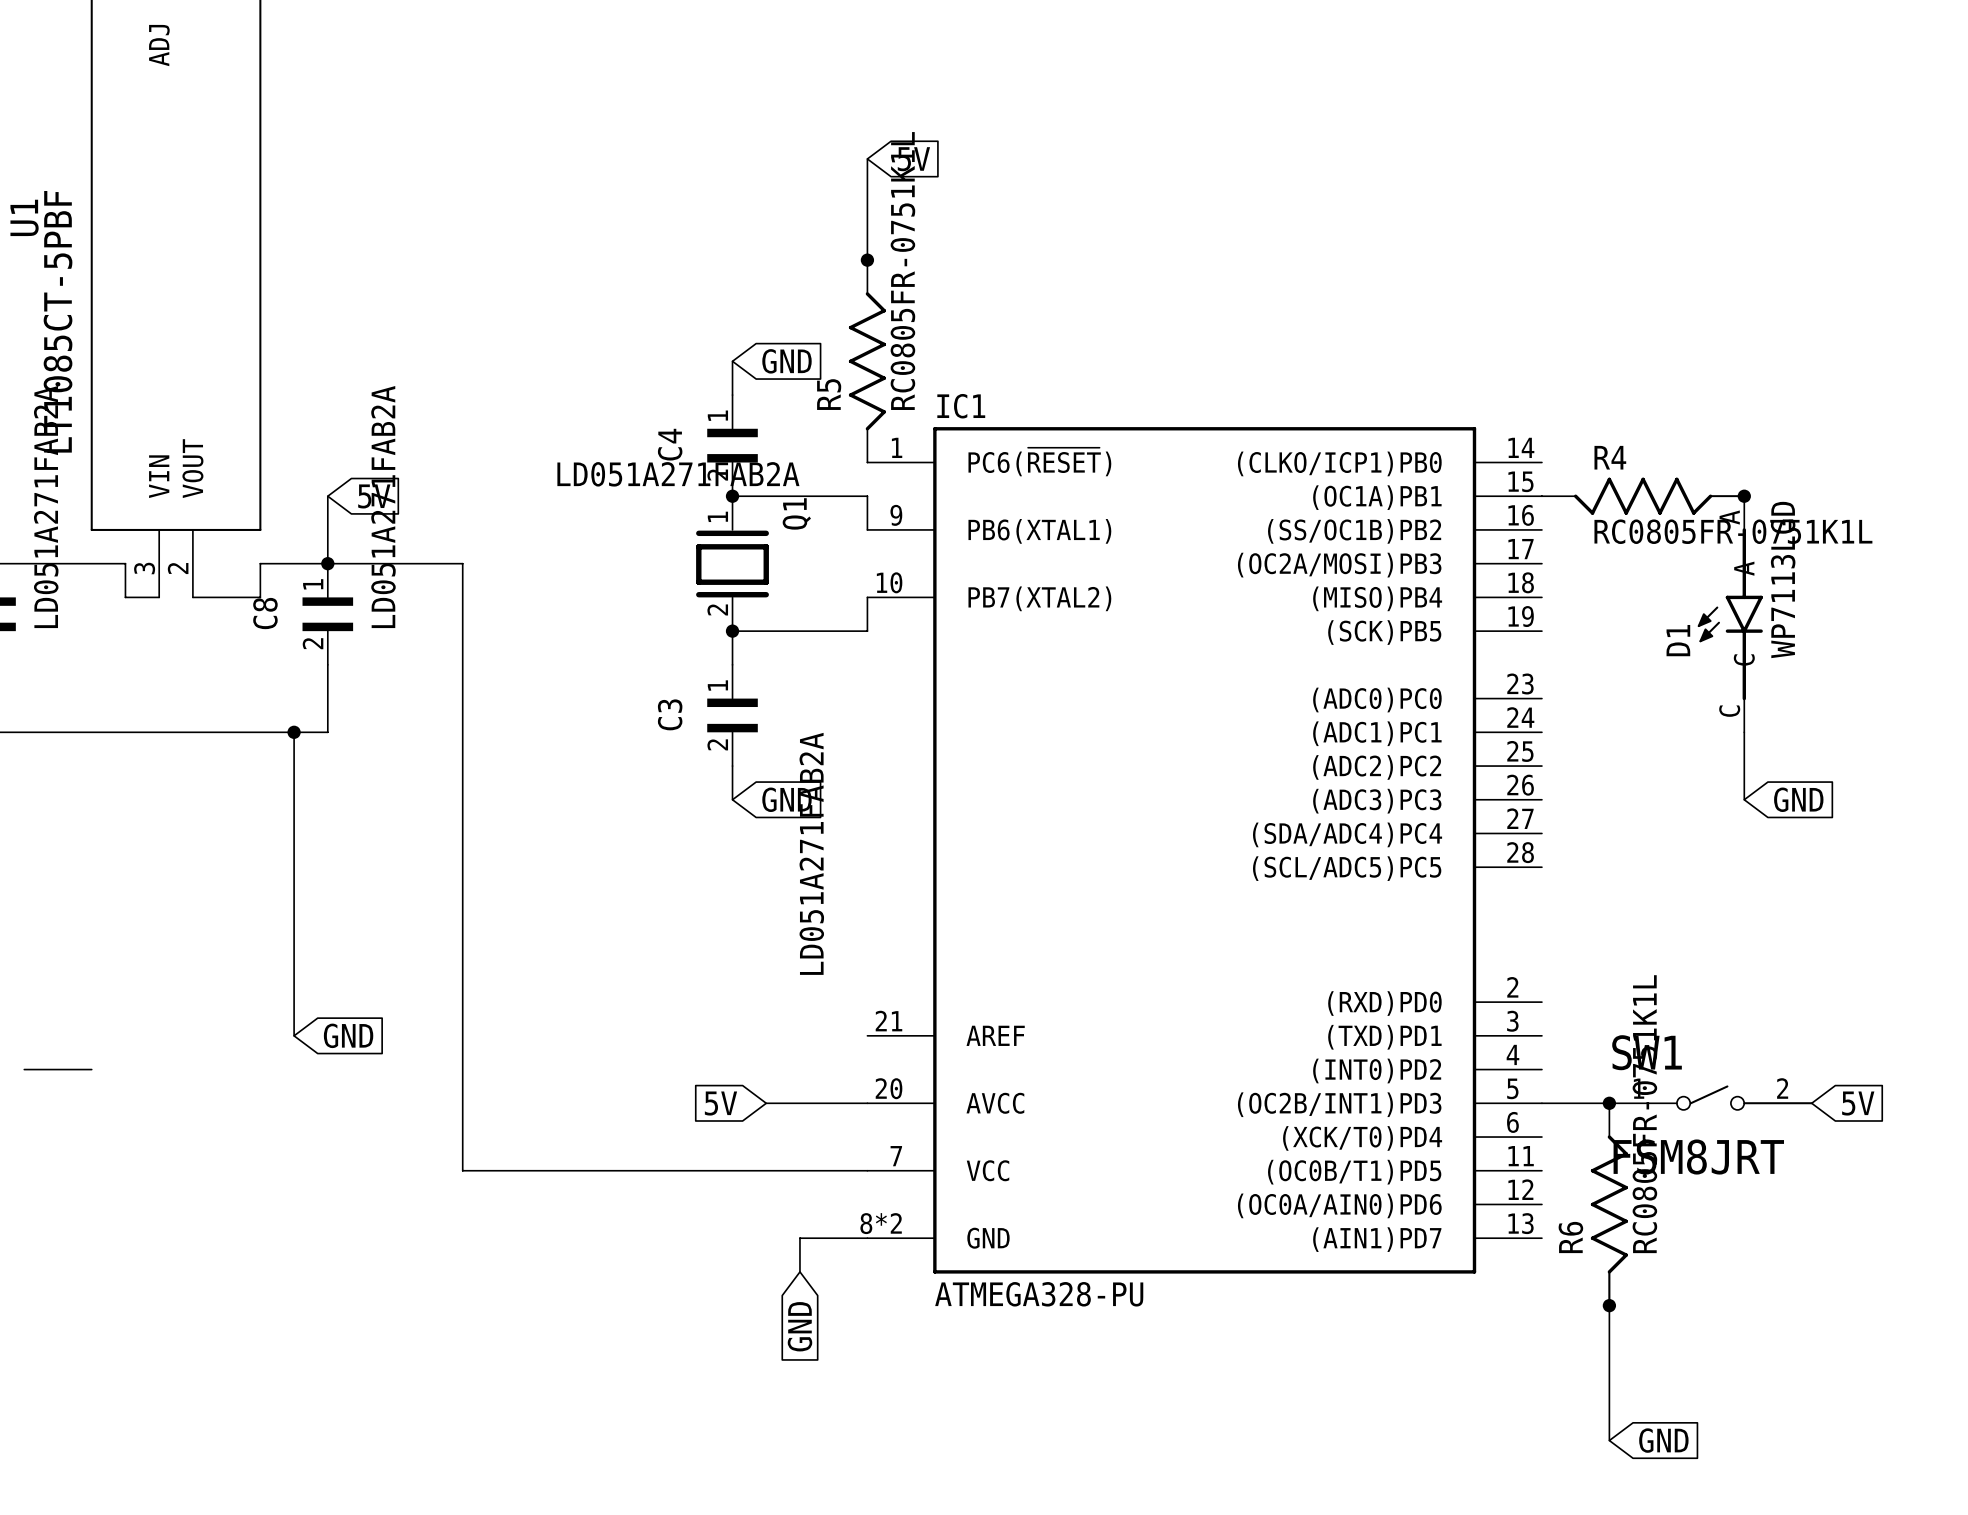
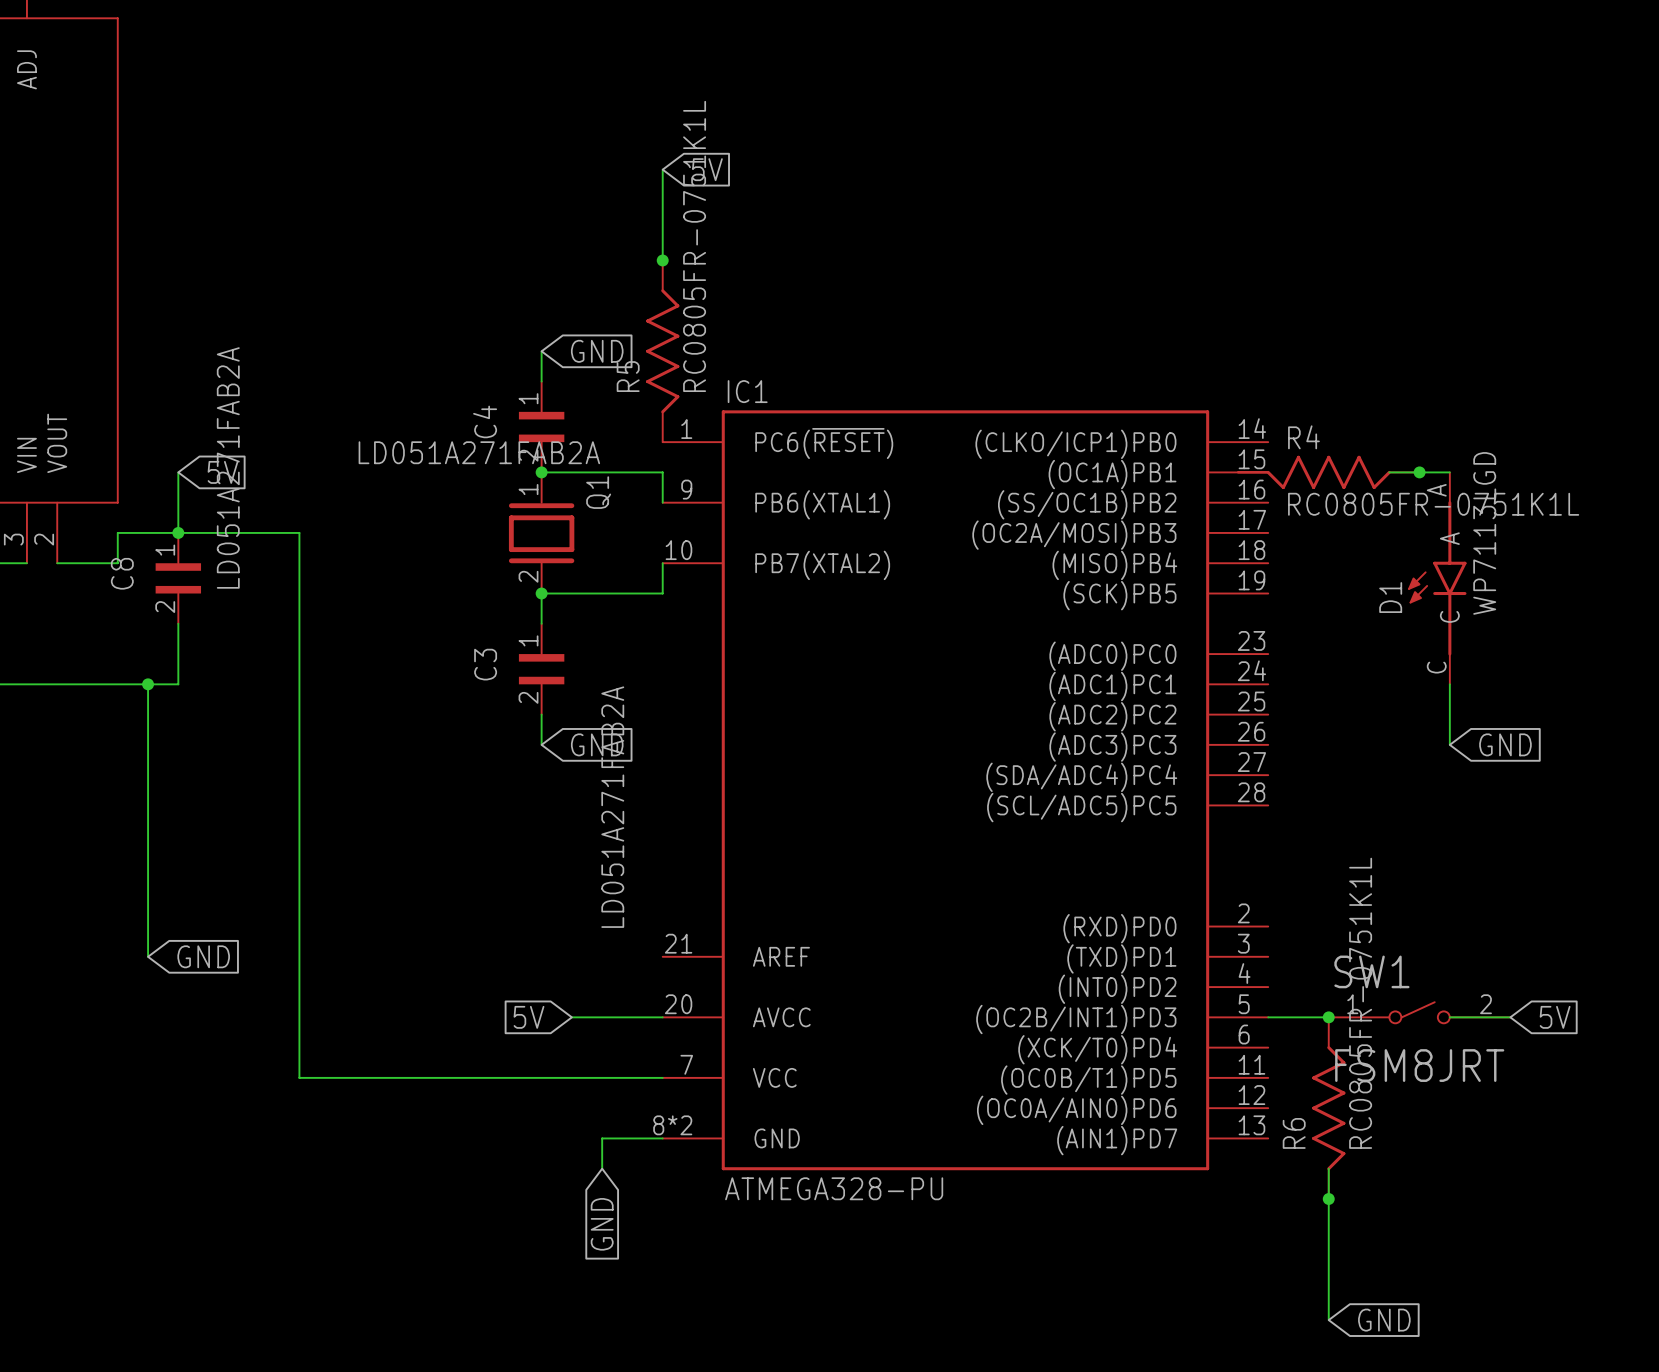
R4 position: (1643, 496) -> (1328, 472)
wire: none -> (1389, 472) (1419, 472)
junction position: (1744, 496) -> (1419, 472)

